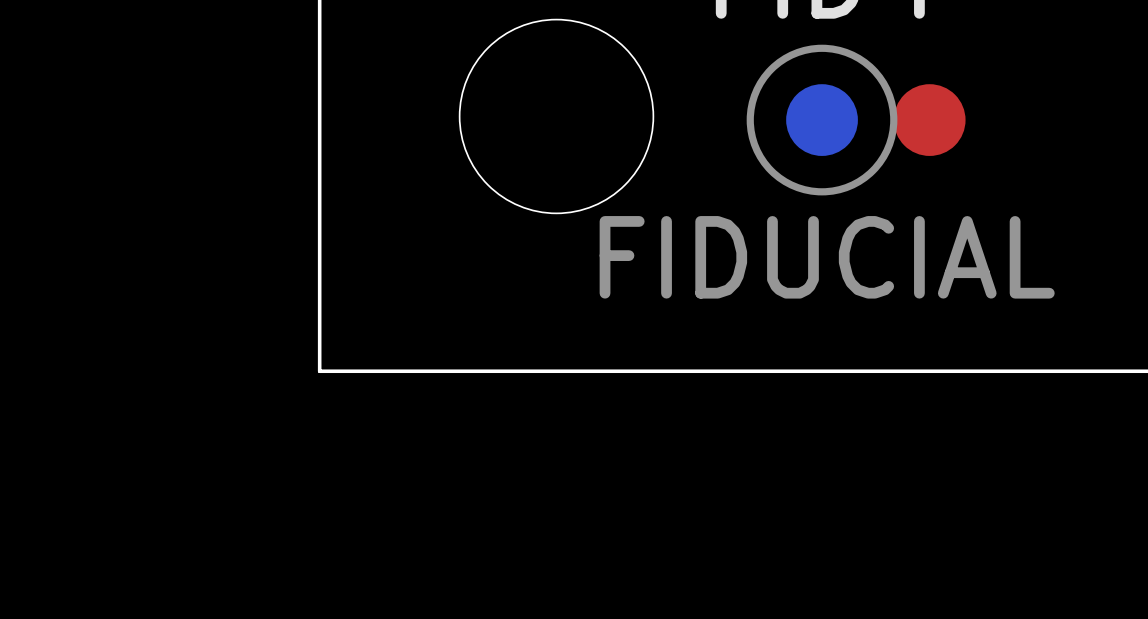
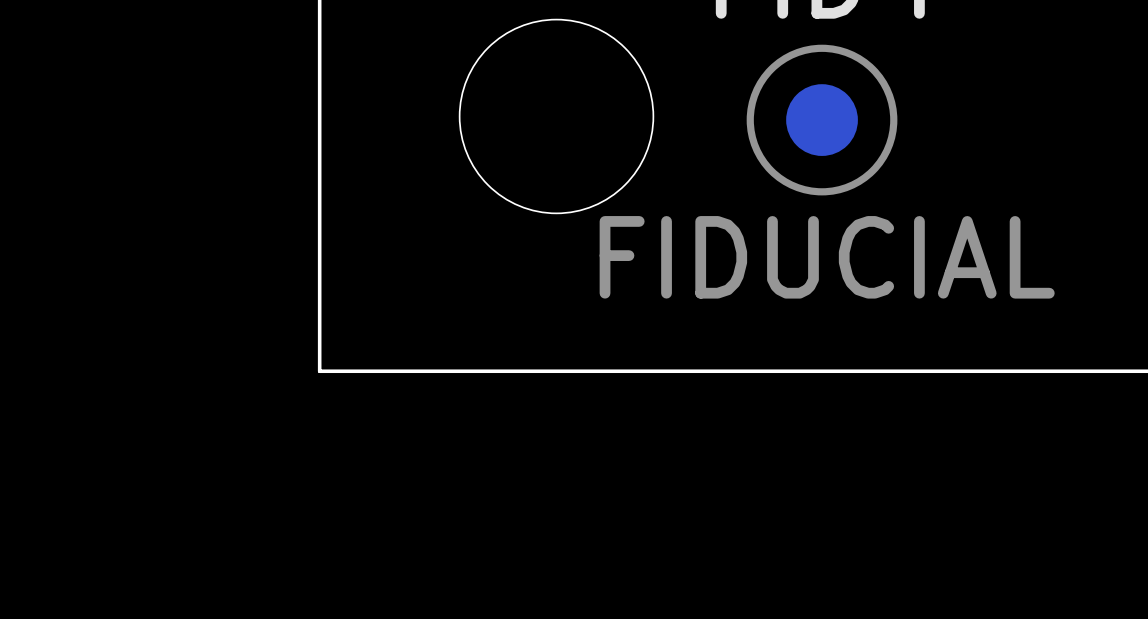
part: (929, 120) -> none

